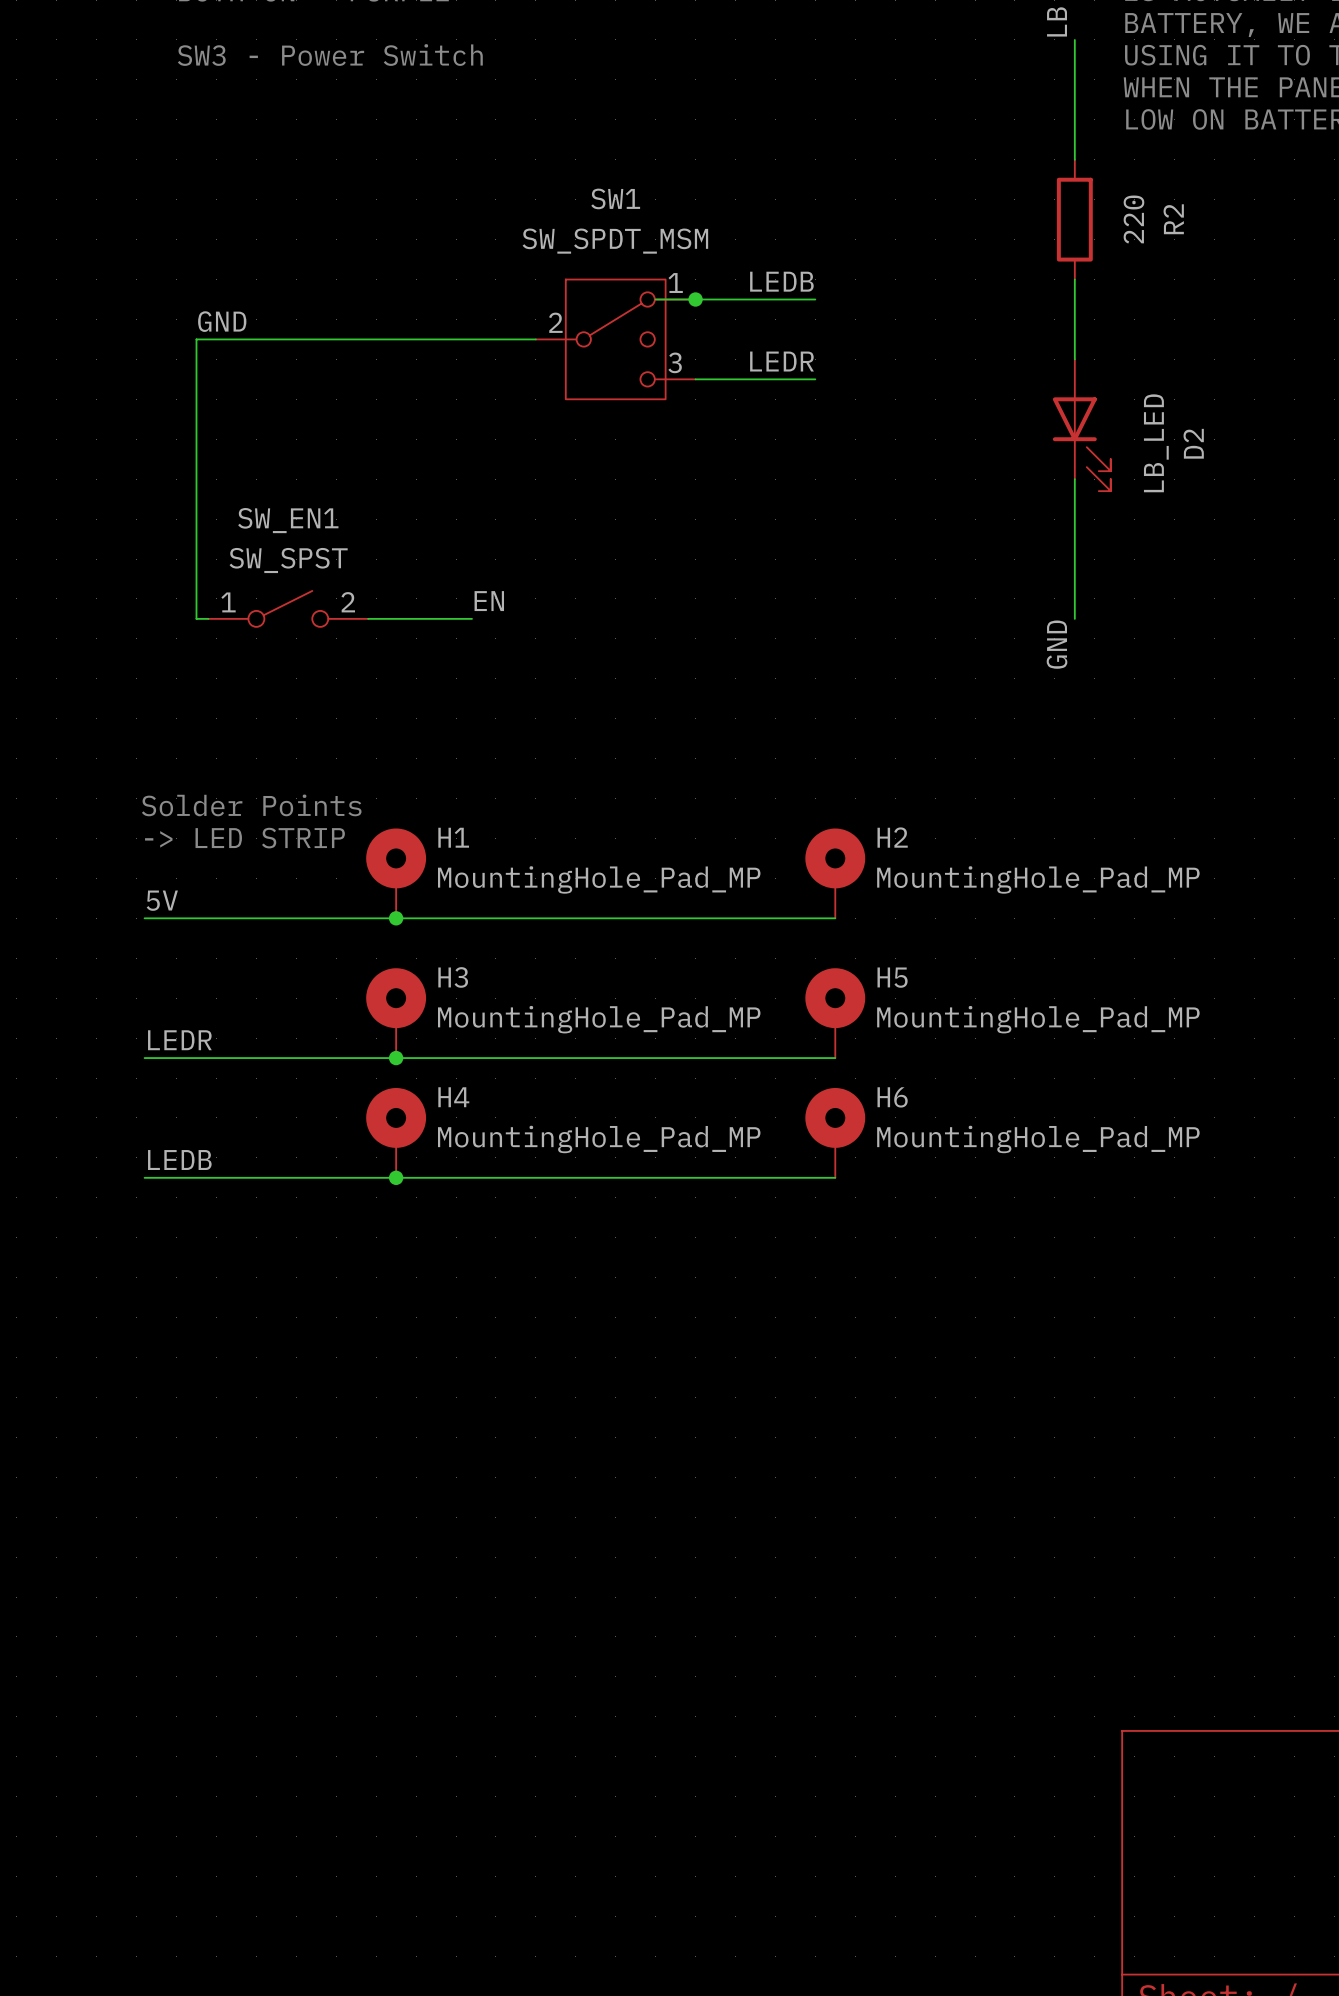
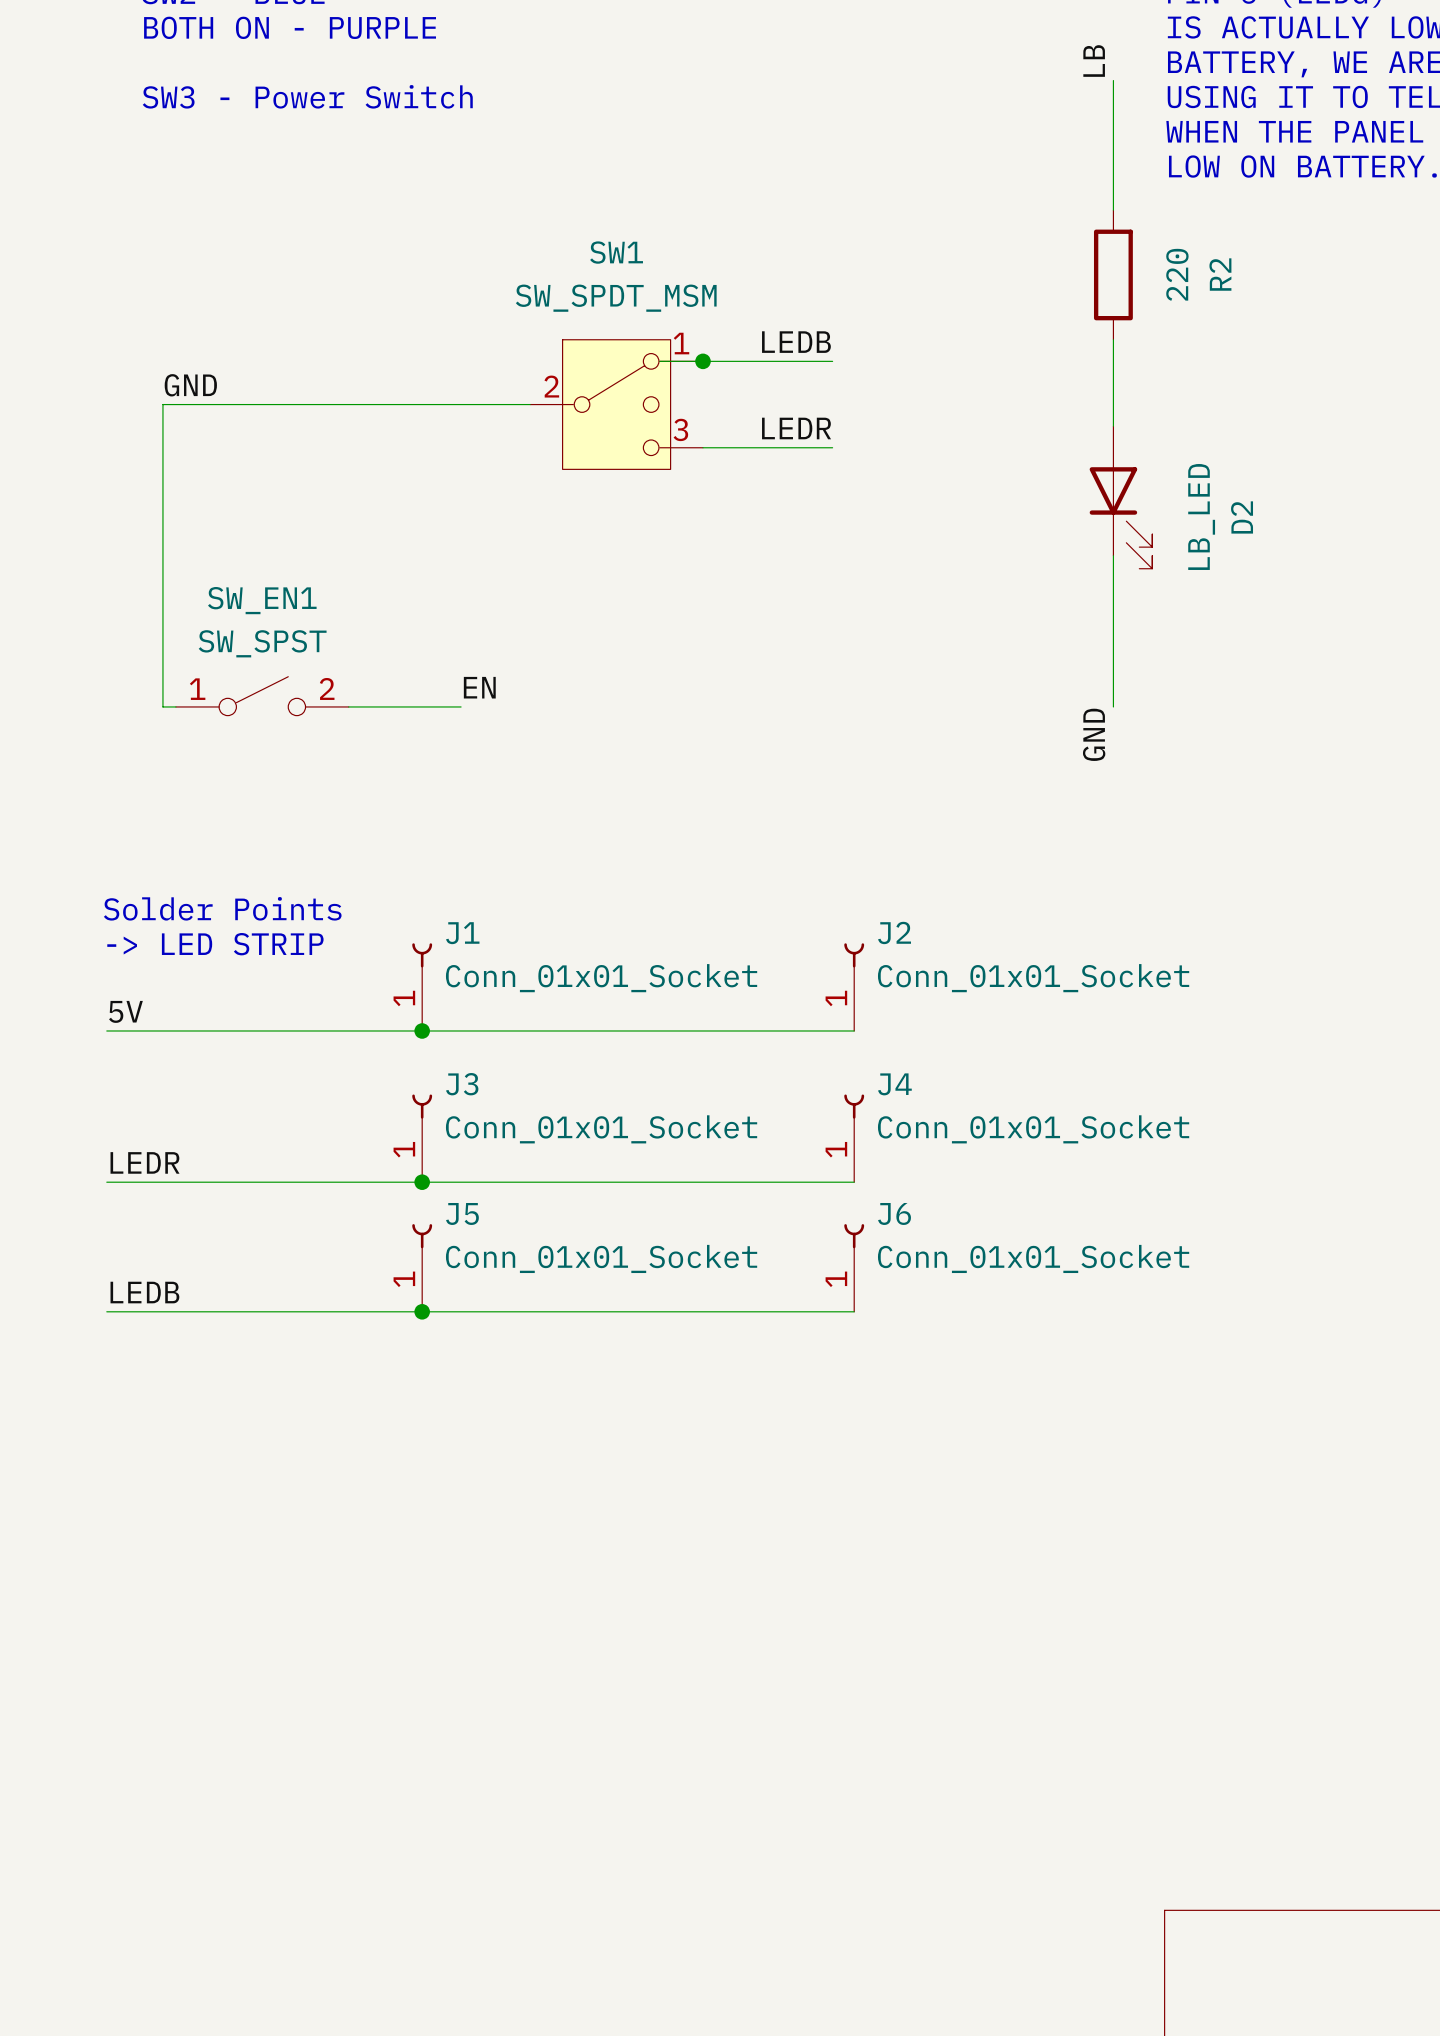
H1: MountingHole_Pad_MP (396, 873) -> none
H2: MountingHole_Pad_MP (835, 873) -> none
J1: none -> Conn_01x01_Socket (422, 987)
J2: none -> Conn_01x01_Socket (854, 987)
junction position: (396, 918) -> (422, 1030)
H3: MountingHole_Pad_MP (396, 1013) -> none
H5: MountingHole_Pad_MP (835, 1013) -> none
J3: none -> Conn_01x01_Socket (422, 1138)
J4: none -> Conn_01x01_Socket (854, 1138)
junction position: (396, 1058) -> (422, 1182)
H4: MountingHole_Pad_MP (396, 1132) -> none
H6: MountingHole_Pad_MP (835, 1132) -> none
J5: none -> Conn_01x01_Socket (422, 1267)
J6: none -> Conn_01x01_Socket (854, 1267)
junction position: (396, 1177) -> (422, 1311)

